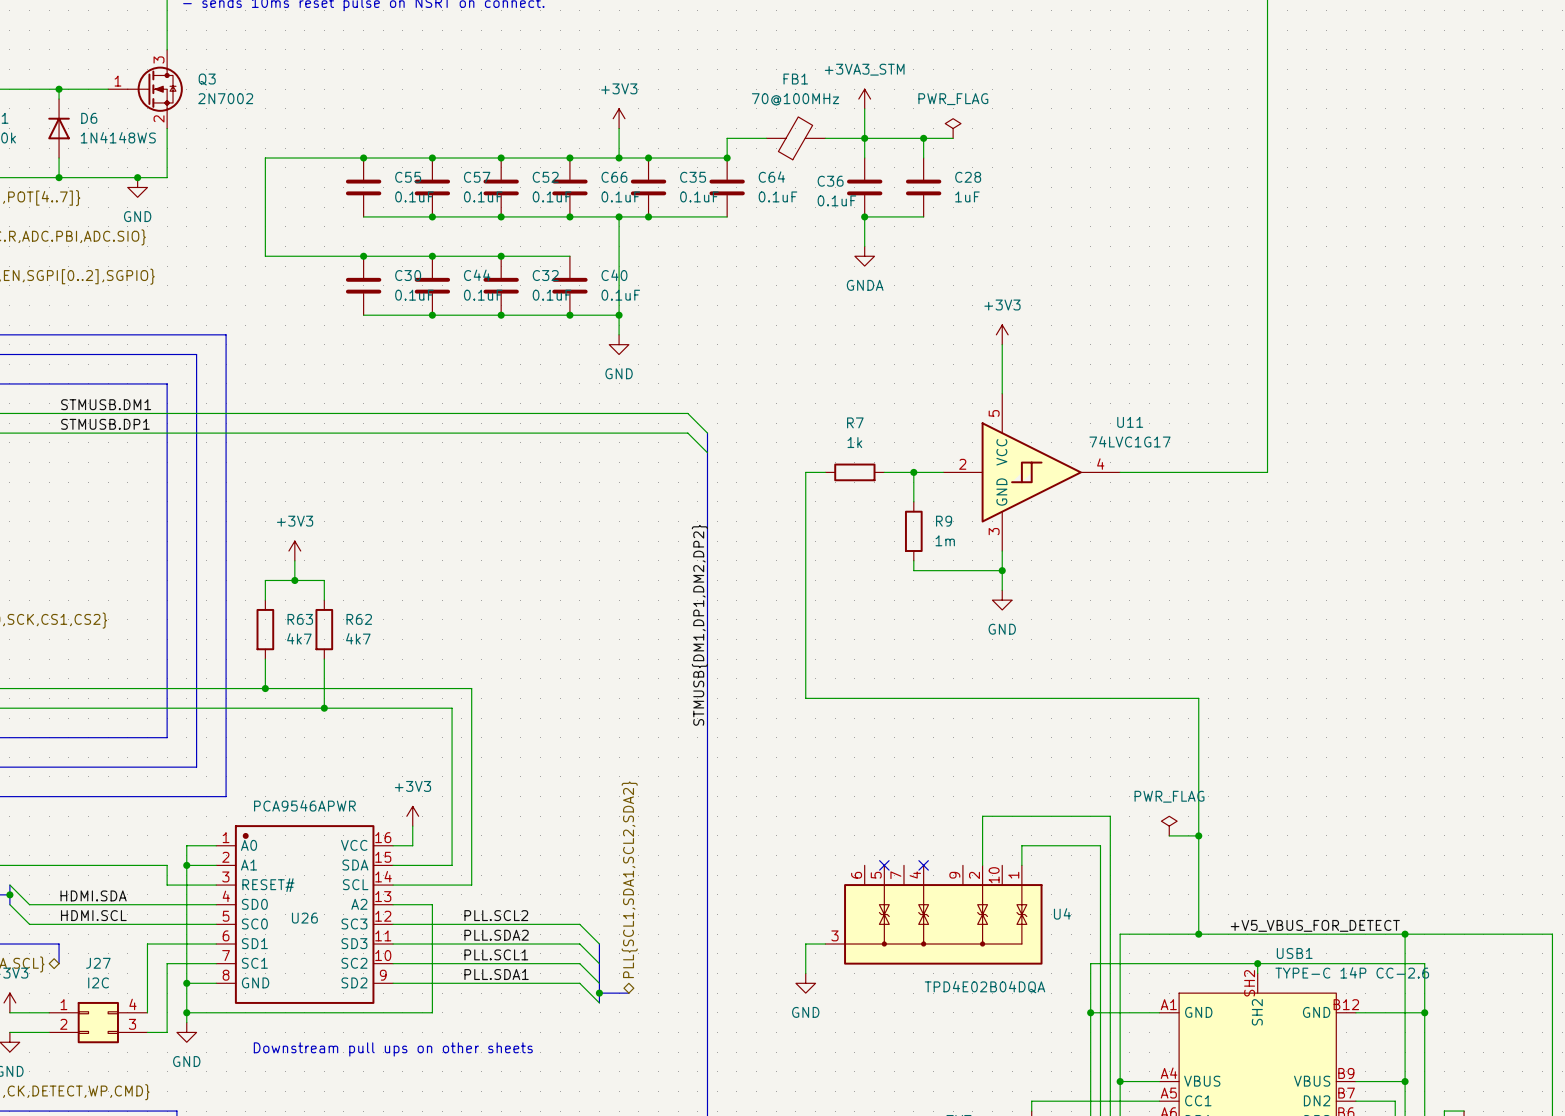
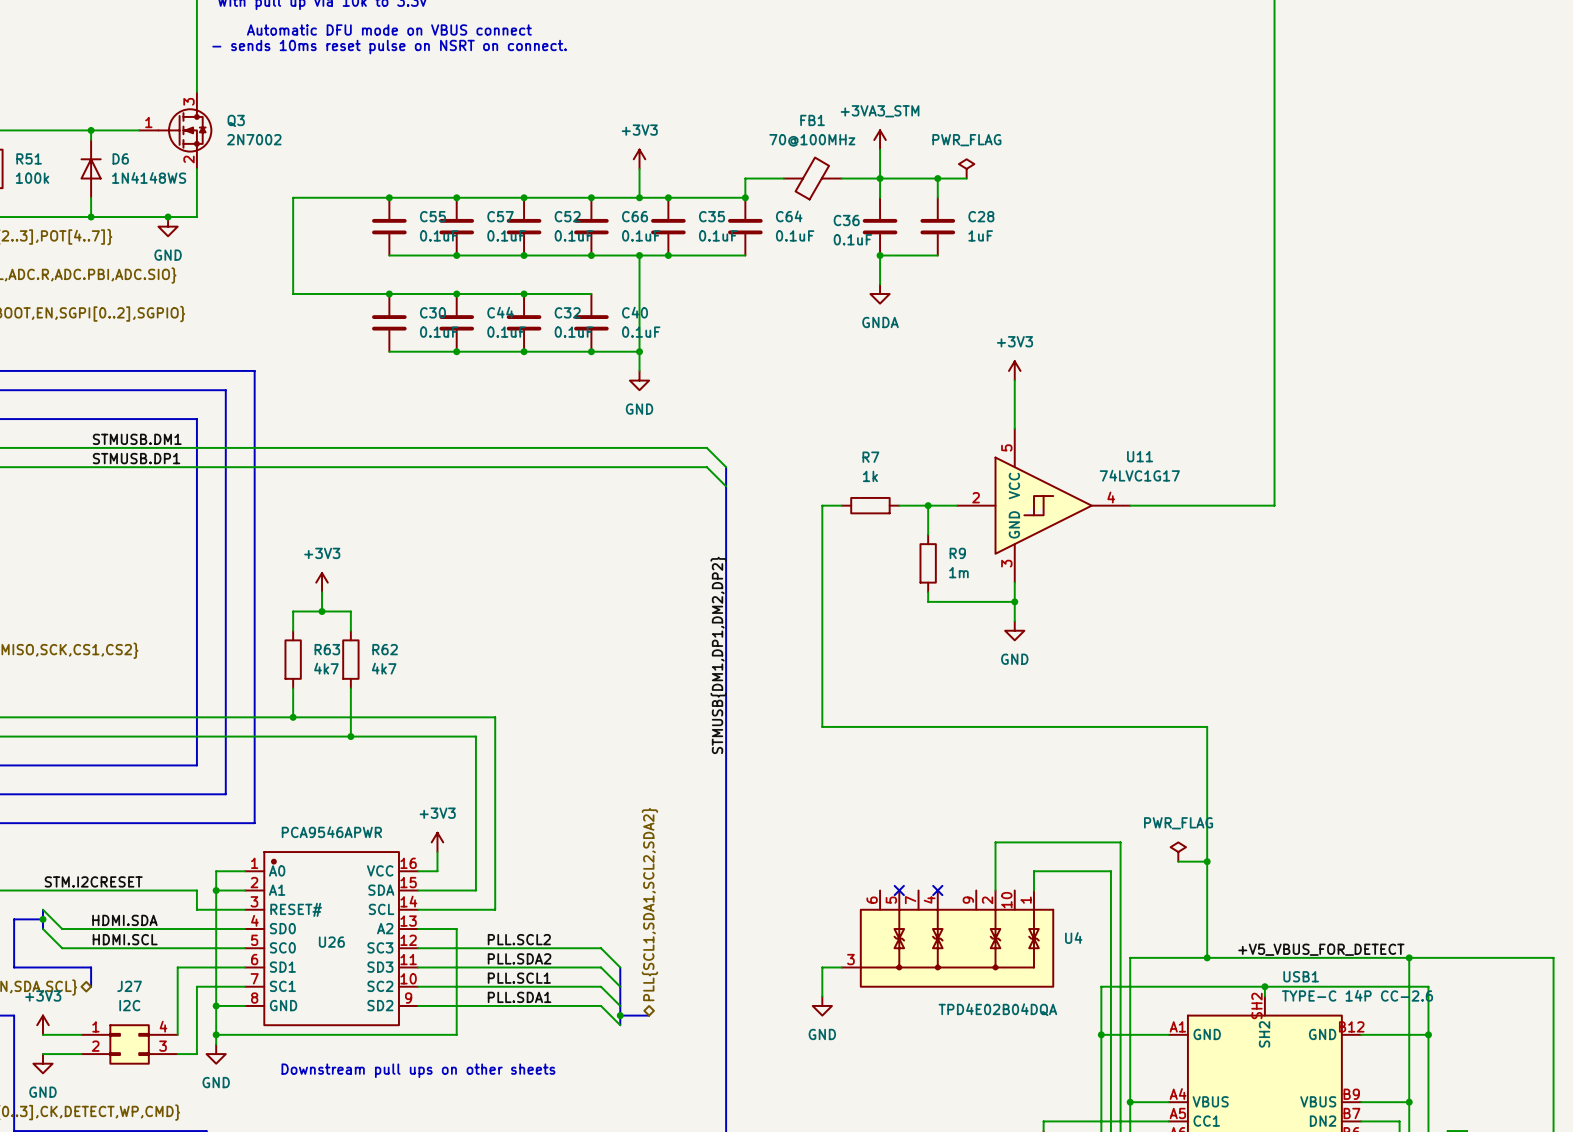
label: none -> STM.I2CRESET (93, 881)

